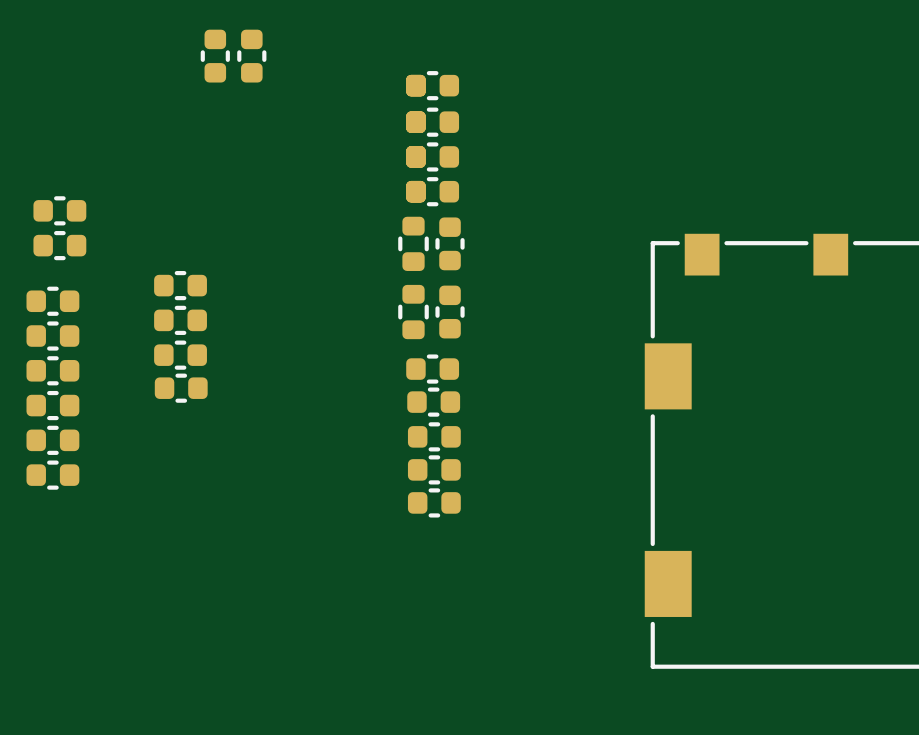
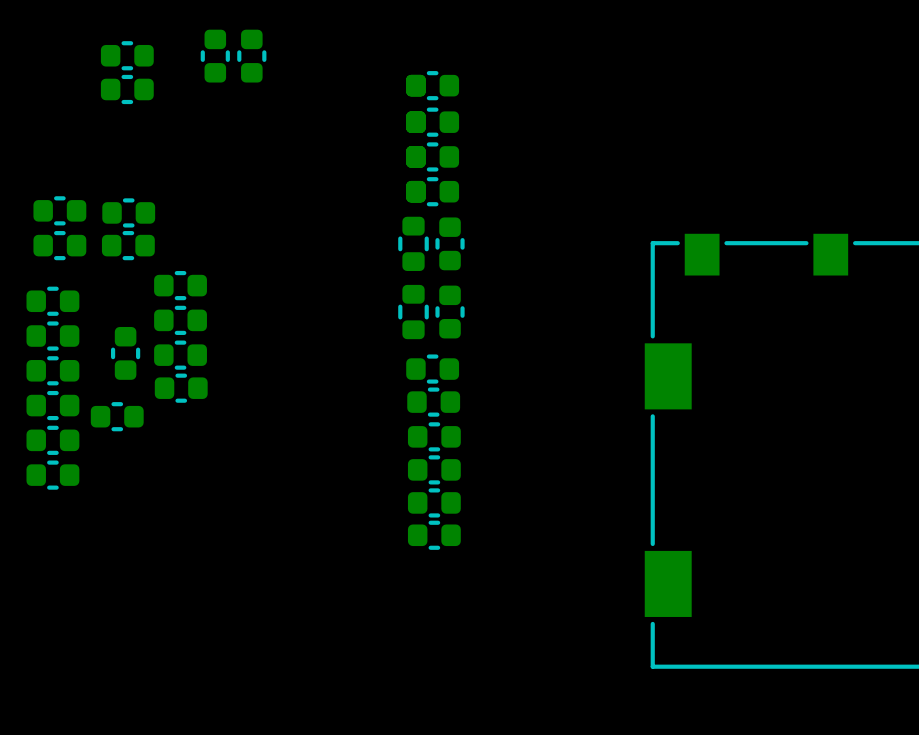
part: none -> (127, 55)
part: none -> (127, 89)
part: none -> (128, 212)
part: none -> (128, 245)
part: none -> (125, 353)
part: none -> (117, 416)
part: none -> (434, 535)

